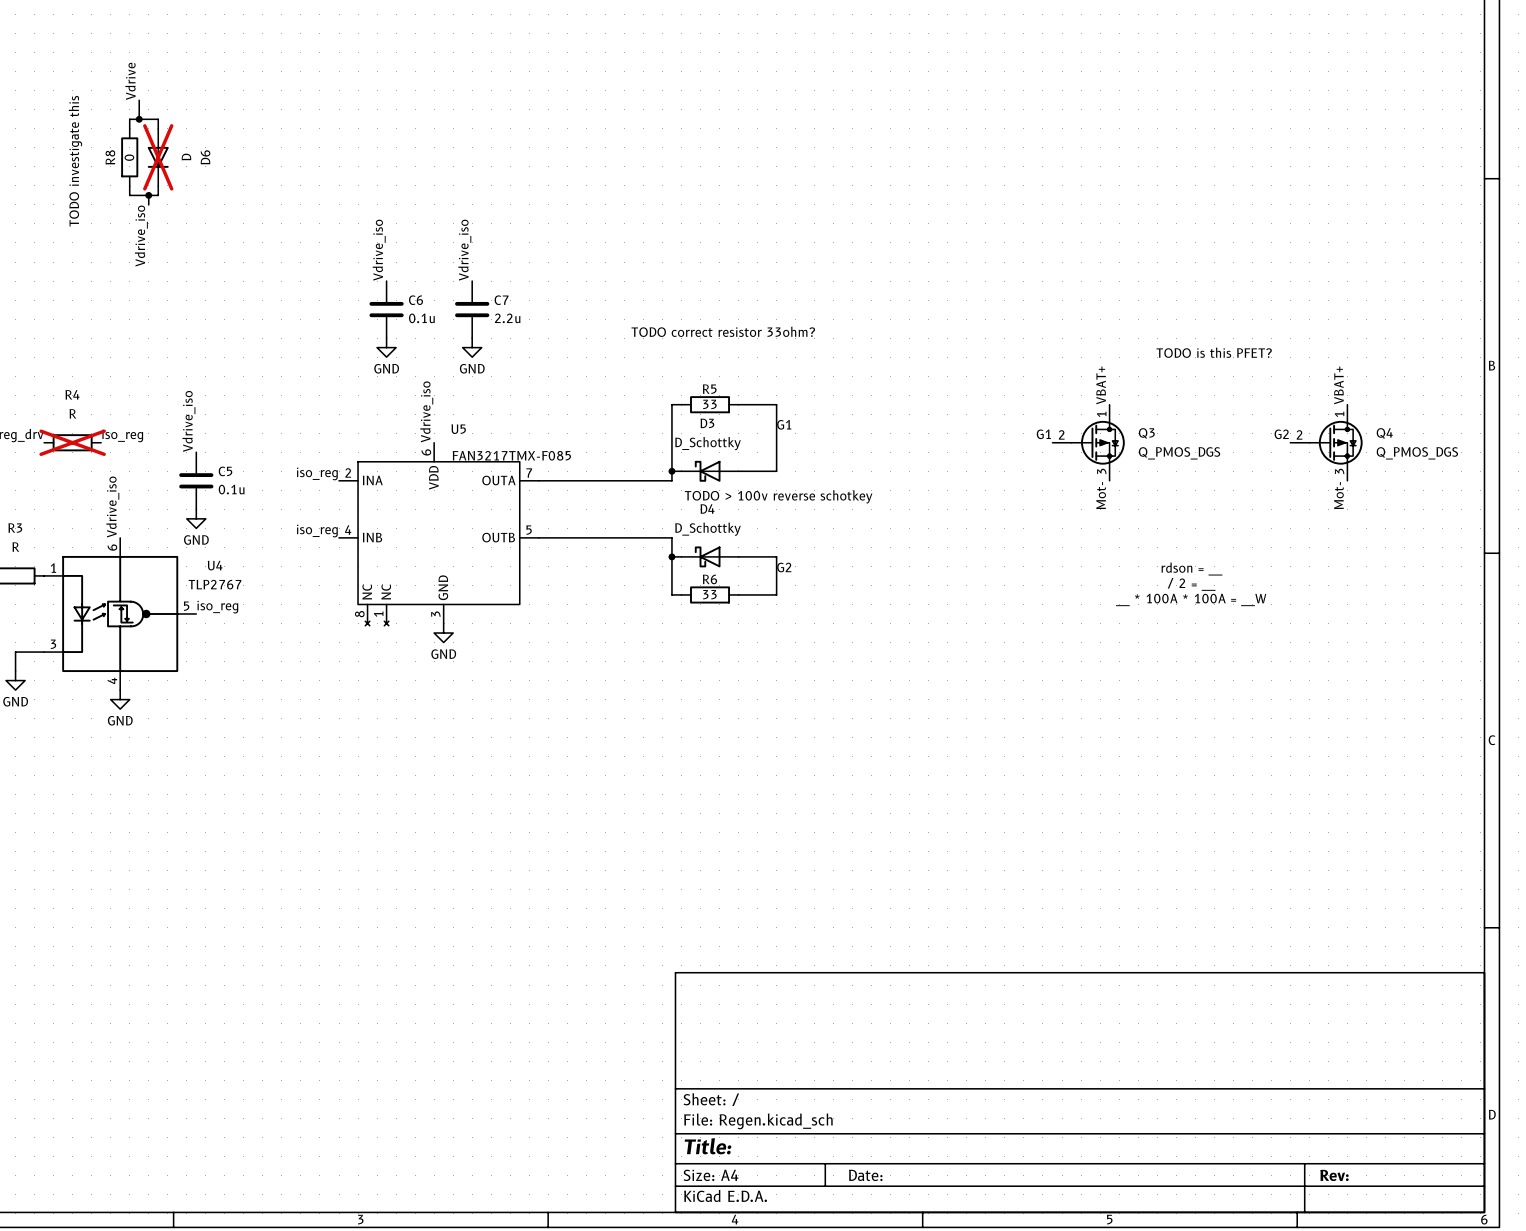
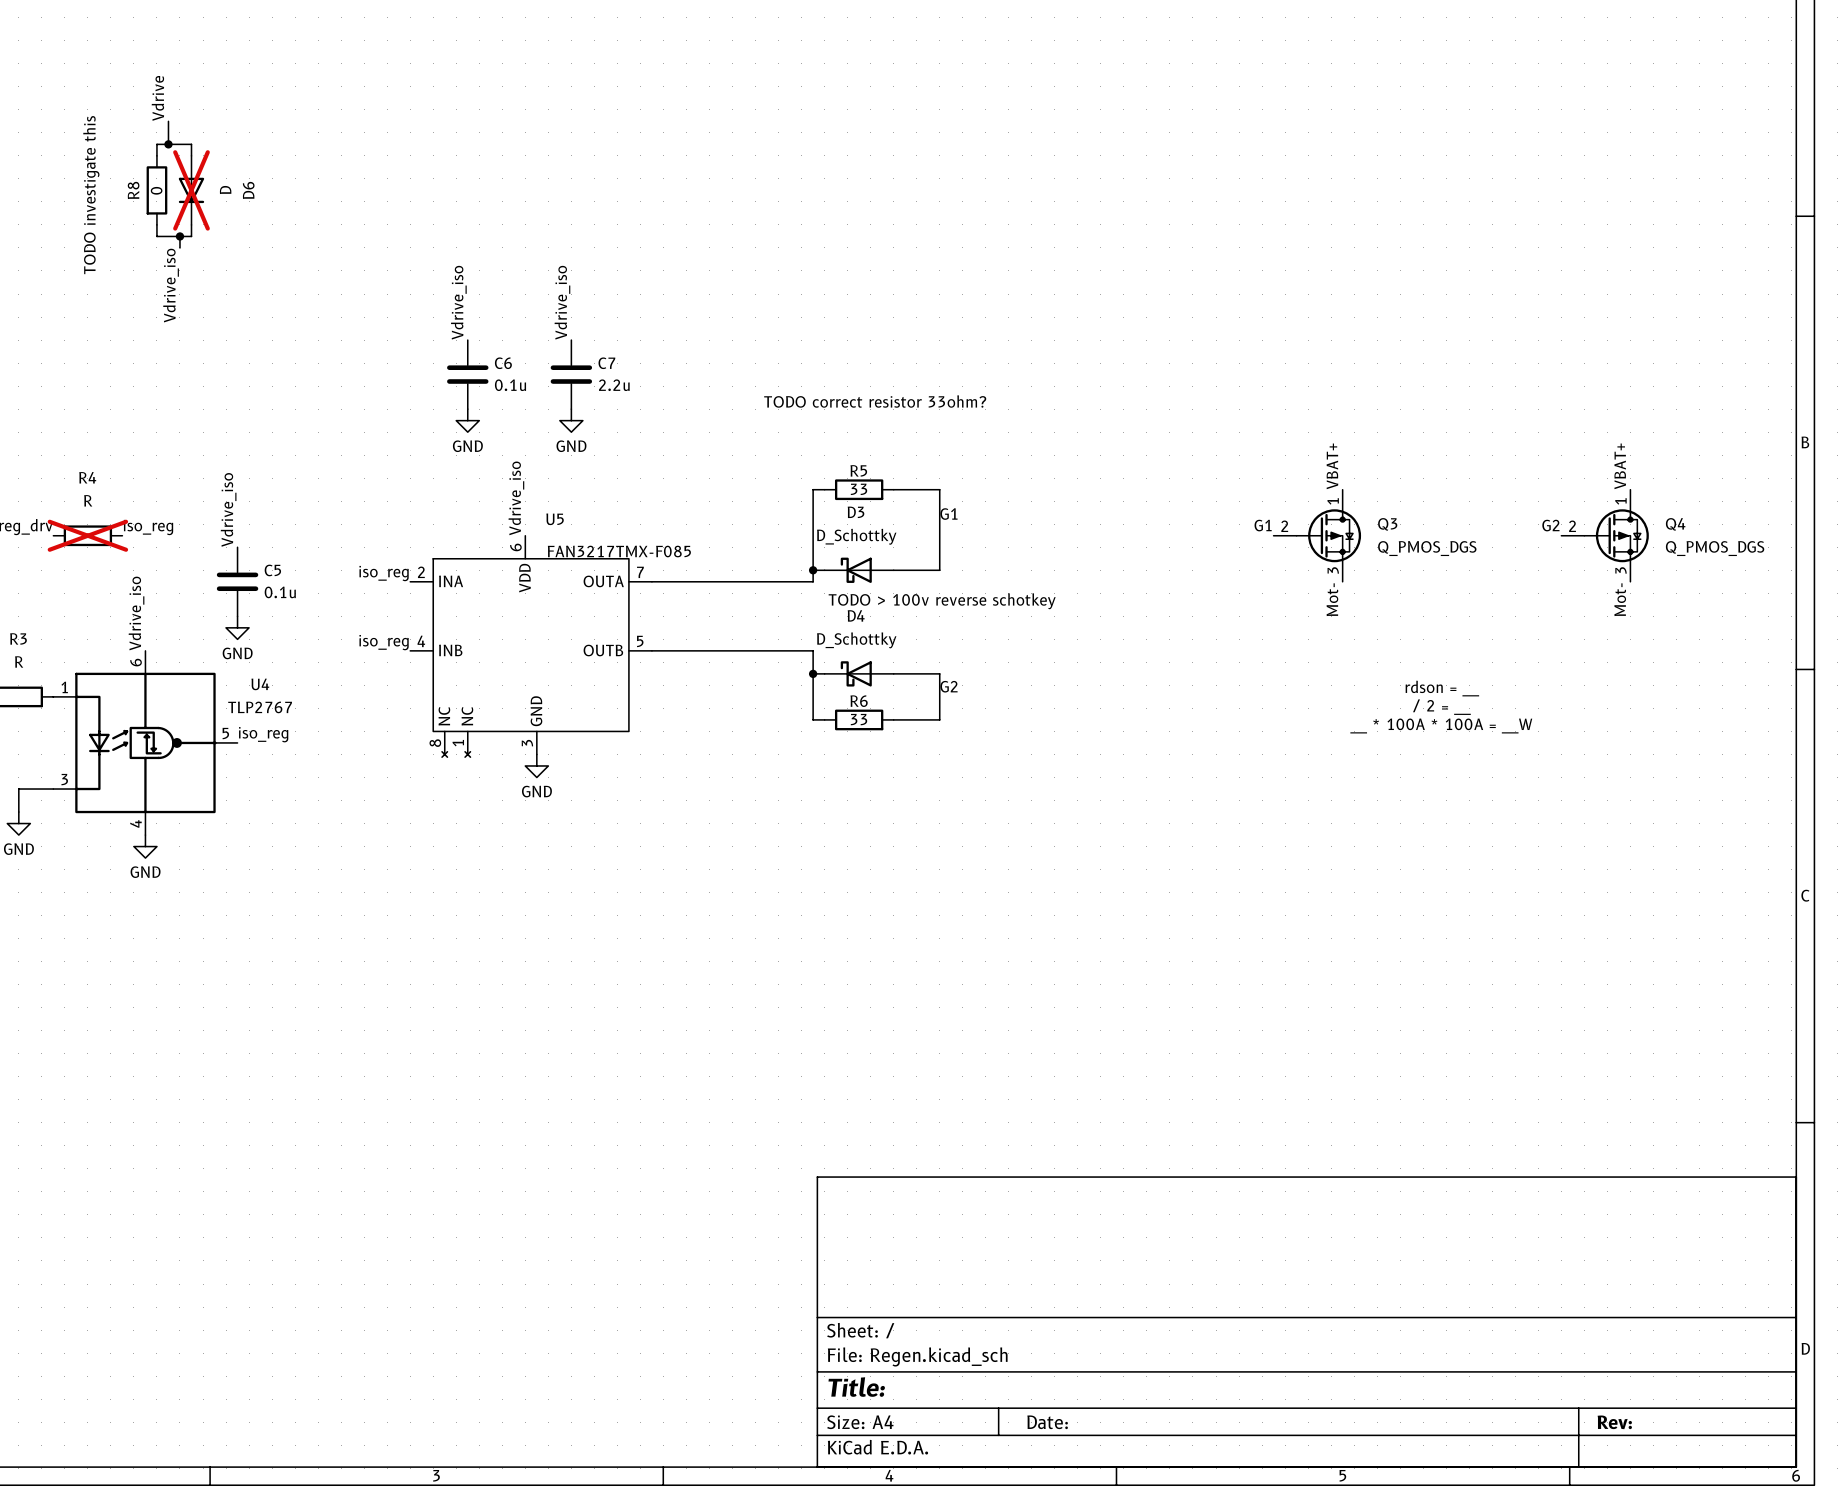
text: TODO is this PFET? (1214, 352) -> none

